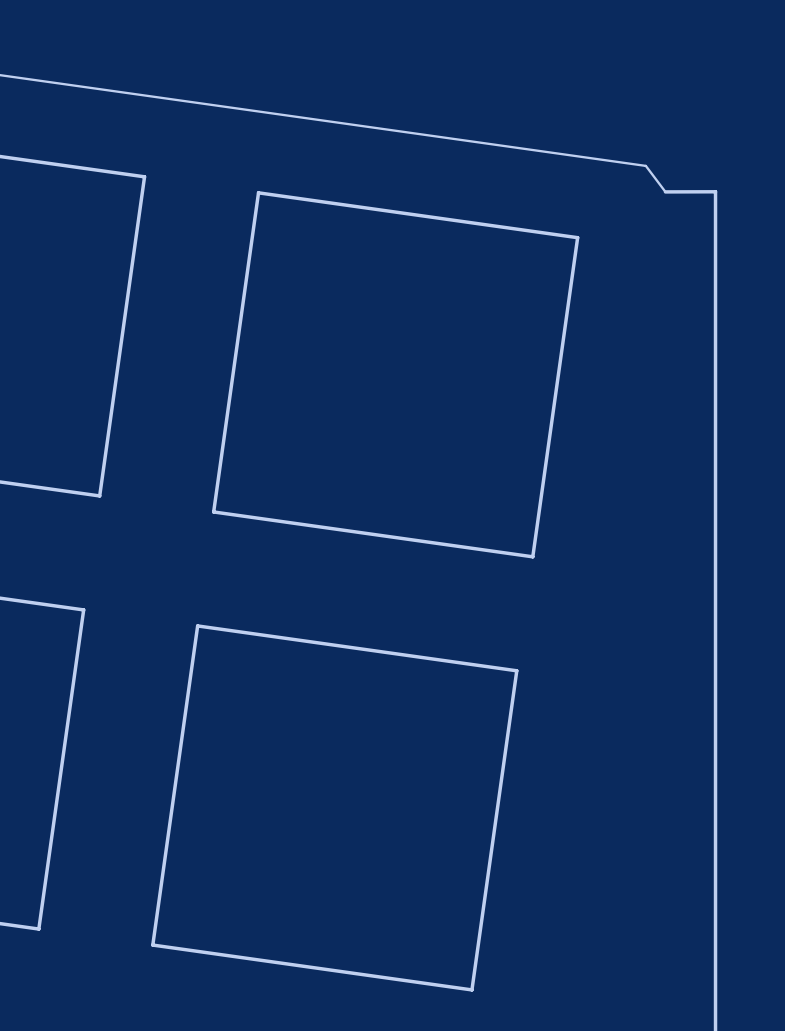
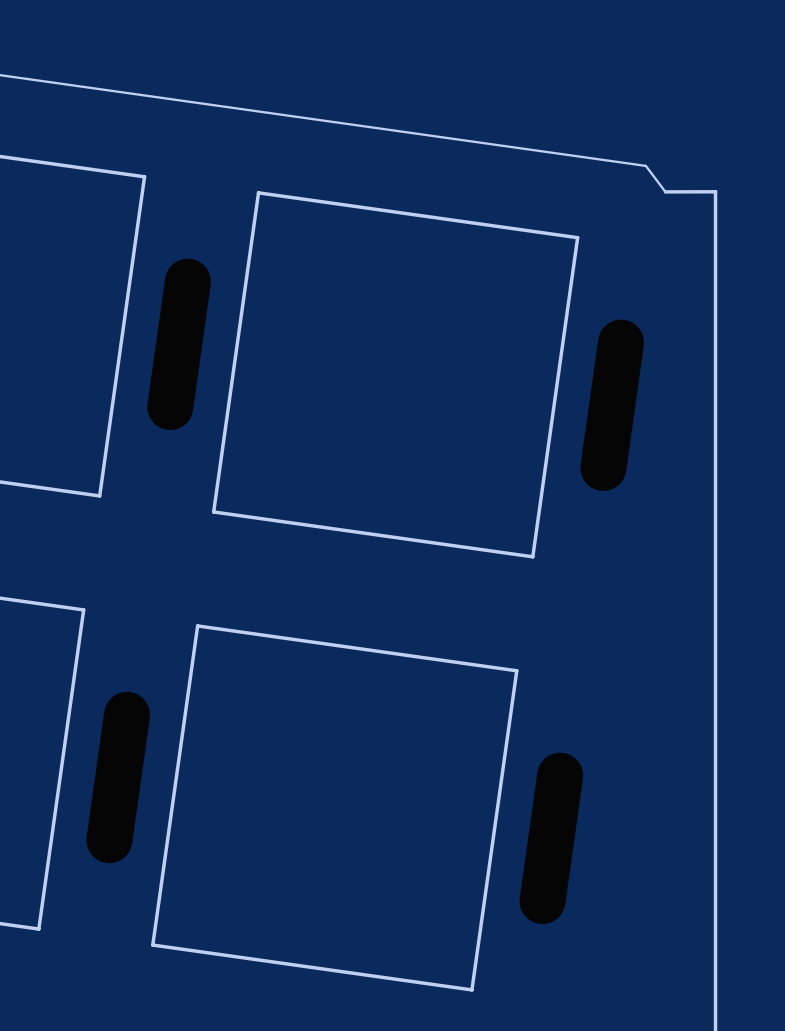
part: none -> (179, 344)
part: none -> (612, 405)
part: none -> (118, 777)
part: none -> (551, 838)

